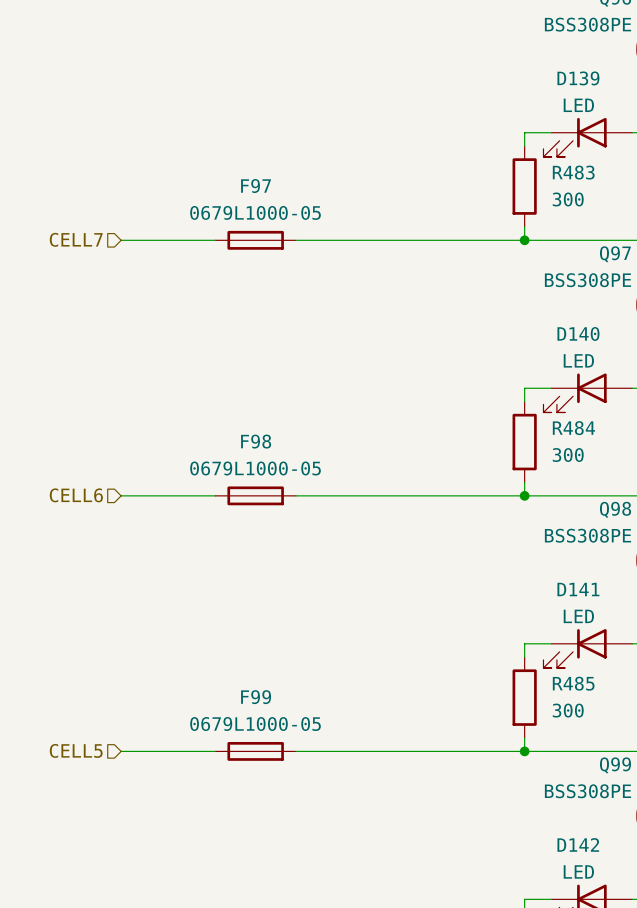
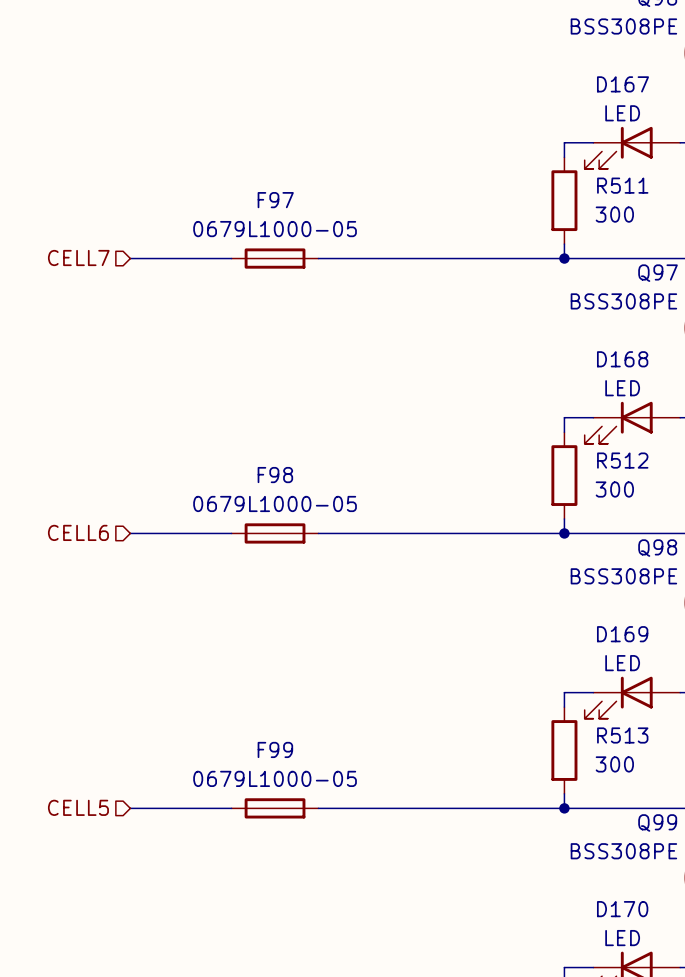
D139 name: D139 (578, 78) -> D167 (622, 84)
R483 name: R483 (573, 172) -> R511 (622, 185)
D140 name: D140 (578, 333) -> D168 (622, 359)
R484 name: R484 (573, 428) -> R512 (622, 460)
D141 name: D141 (578, 589) -> D169 (622, 634)
R485 name: R485 (573, 683) -> R513 (622, 735)
D142 name: D142 (578, 844) -> D170 (622, 909)

